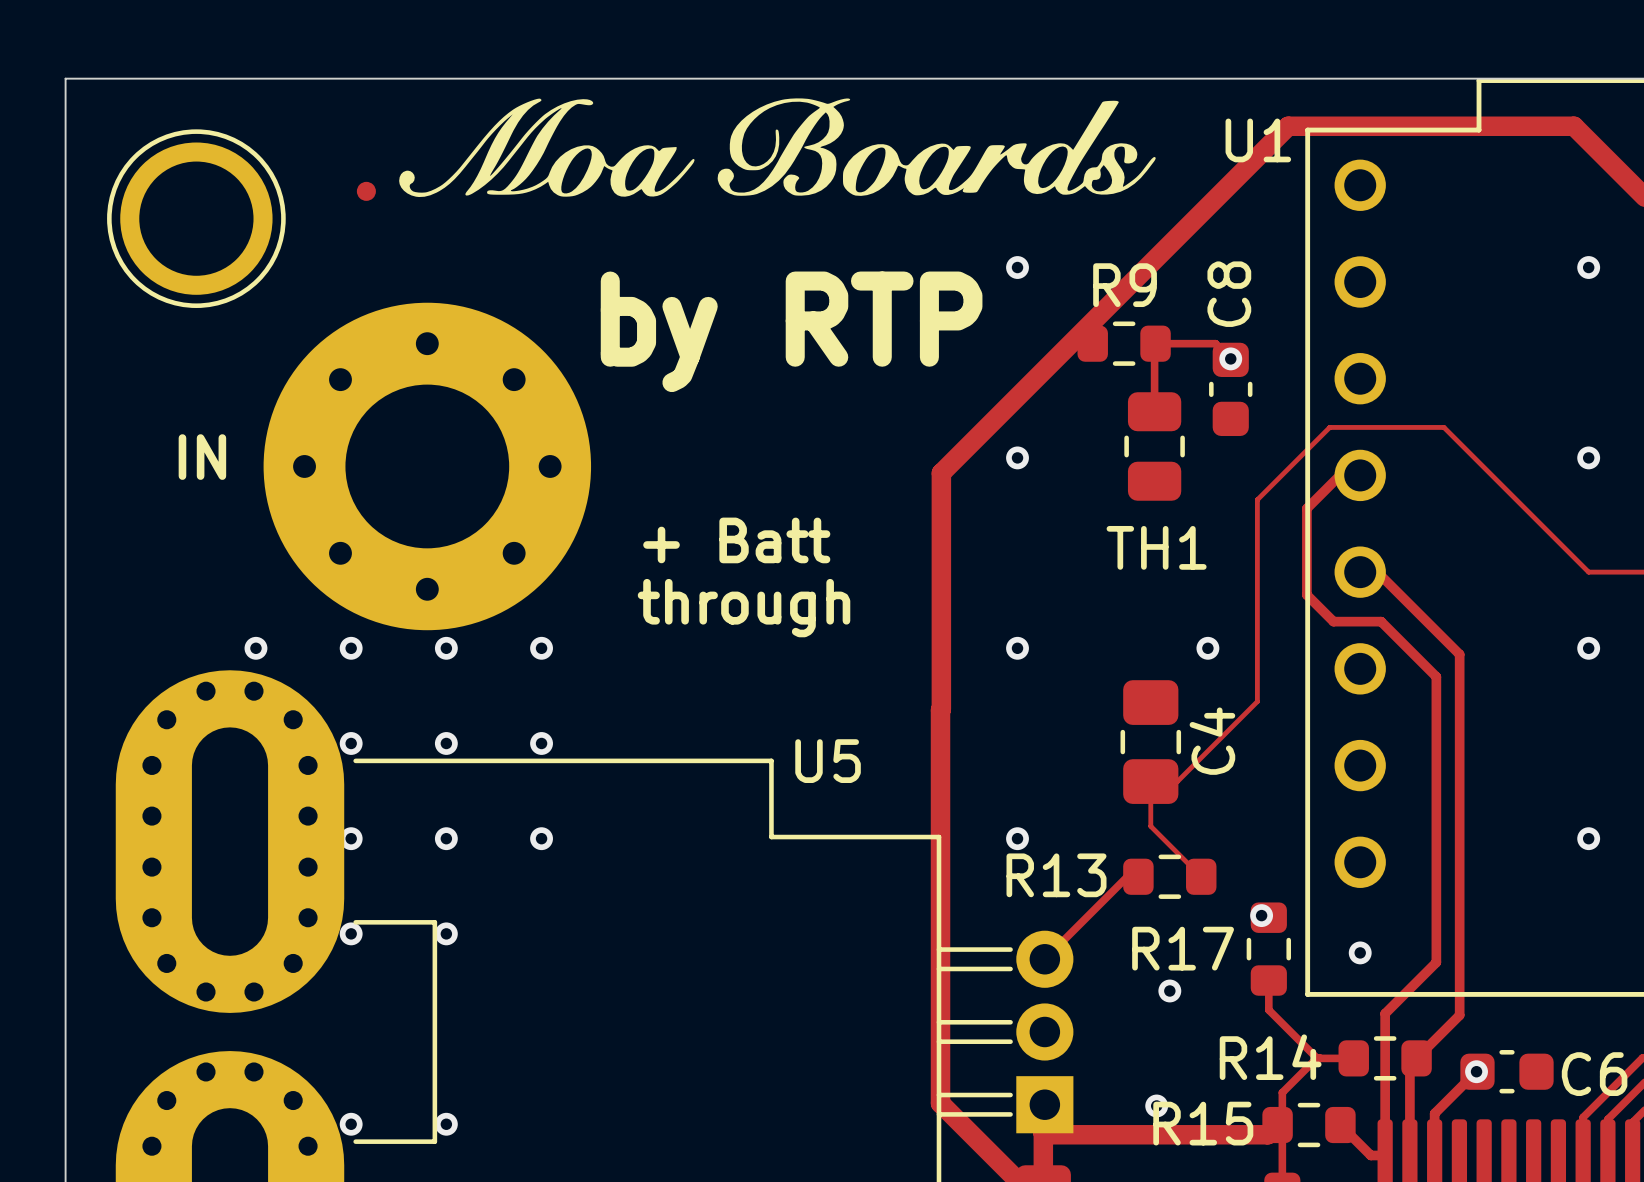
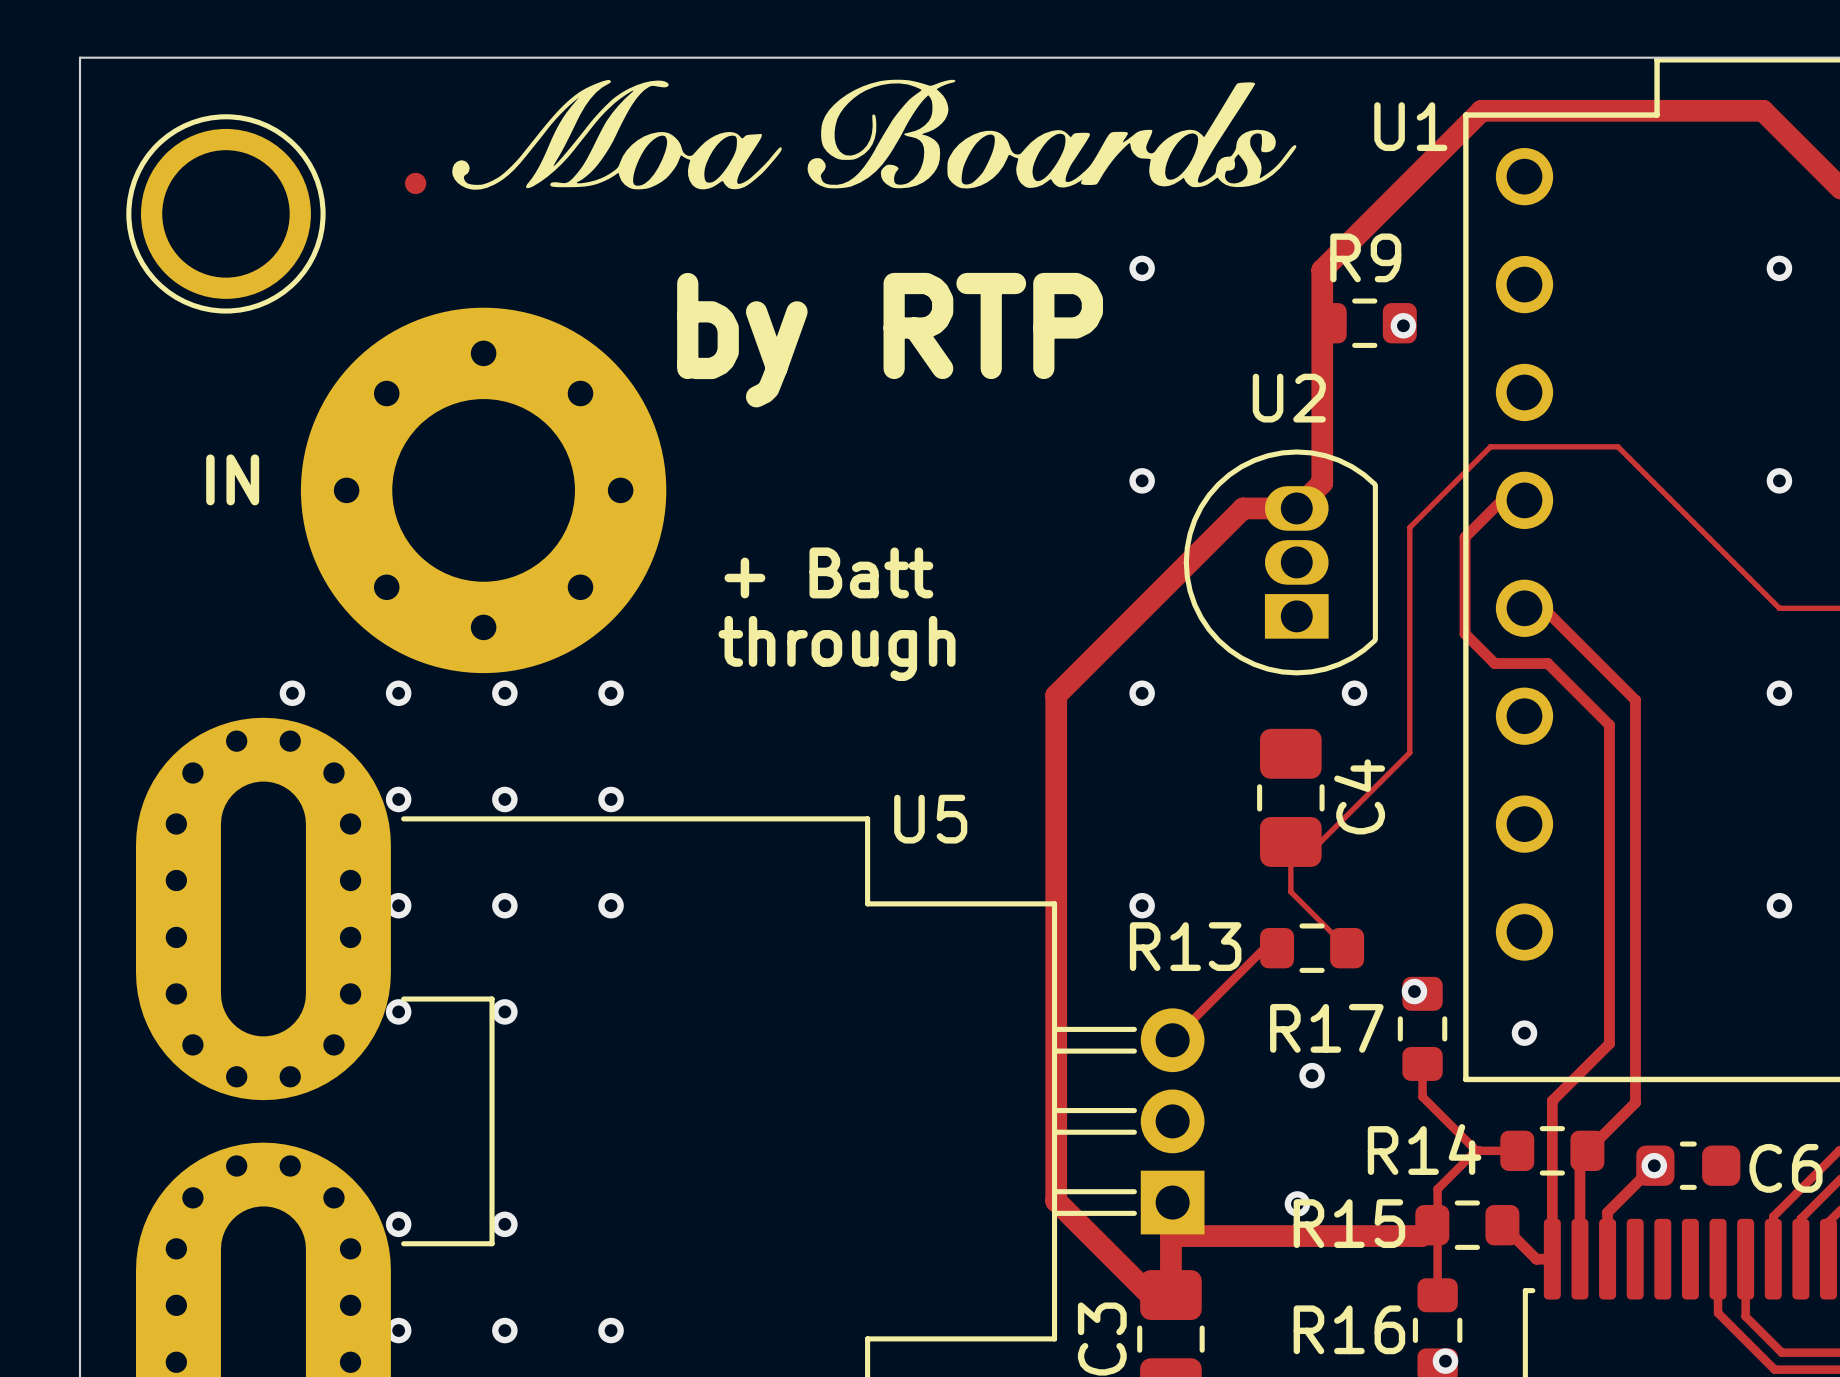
track: (1321, 126) (1288, 126) (941, 473) (940, 710) -> (1481, 110) (1322, 270) (1322, 482) (1296, 508) (1243, 508) (1056, 695) (1056, 762)
R9 position: (1124, 343) -> (1364, 323)
track: (1230, 358) (1215, 343) (1155, 343) (1154, 411) -> none
via position: (1230, 358) -> (1403, 325)
C8: (1230, 389) -> none
TH1: (1154, 446) -> none
U2: none -> (1280, 562)

